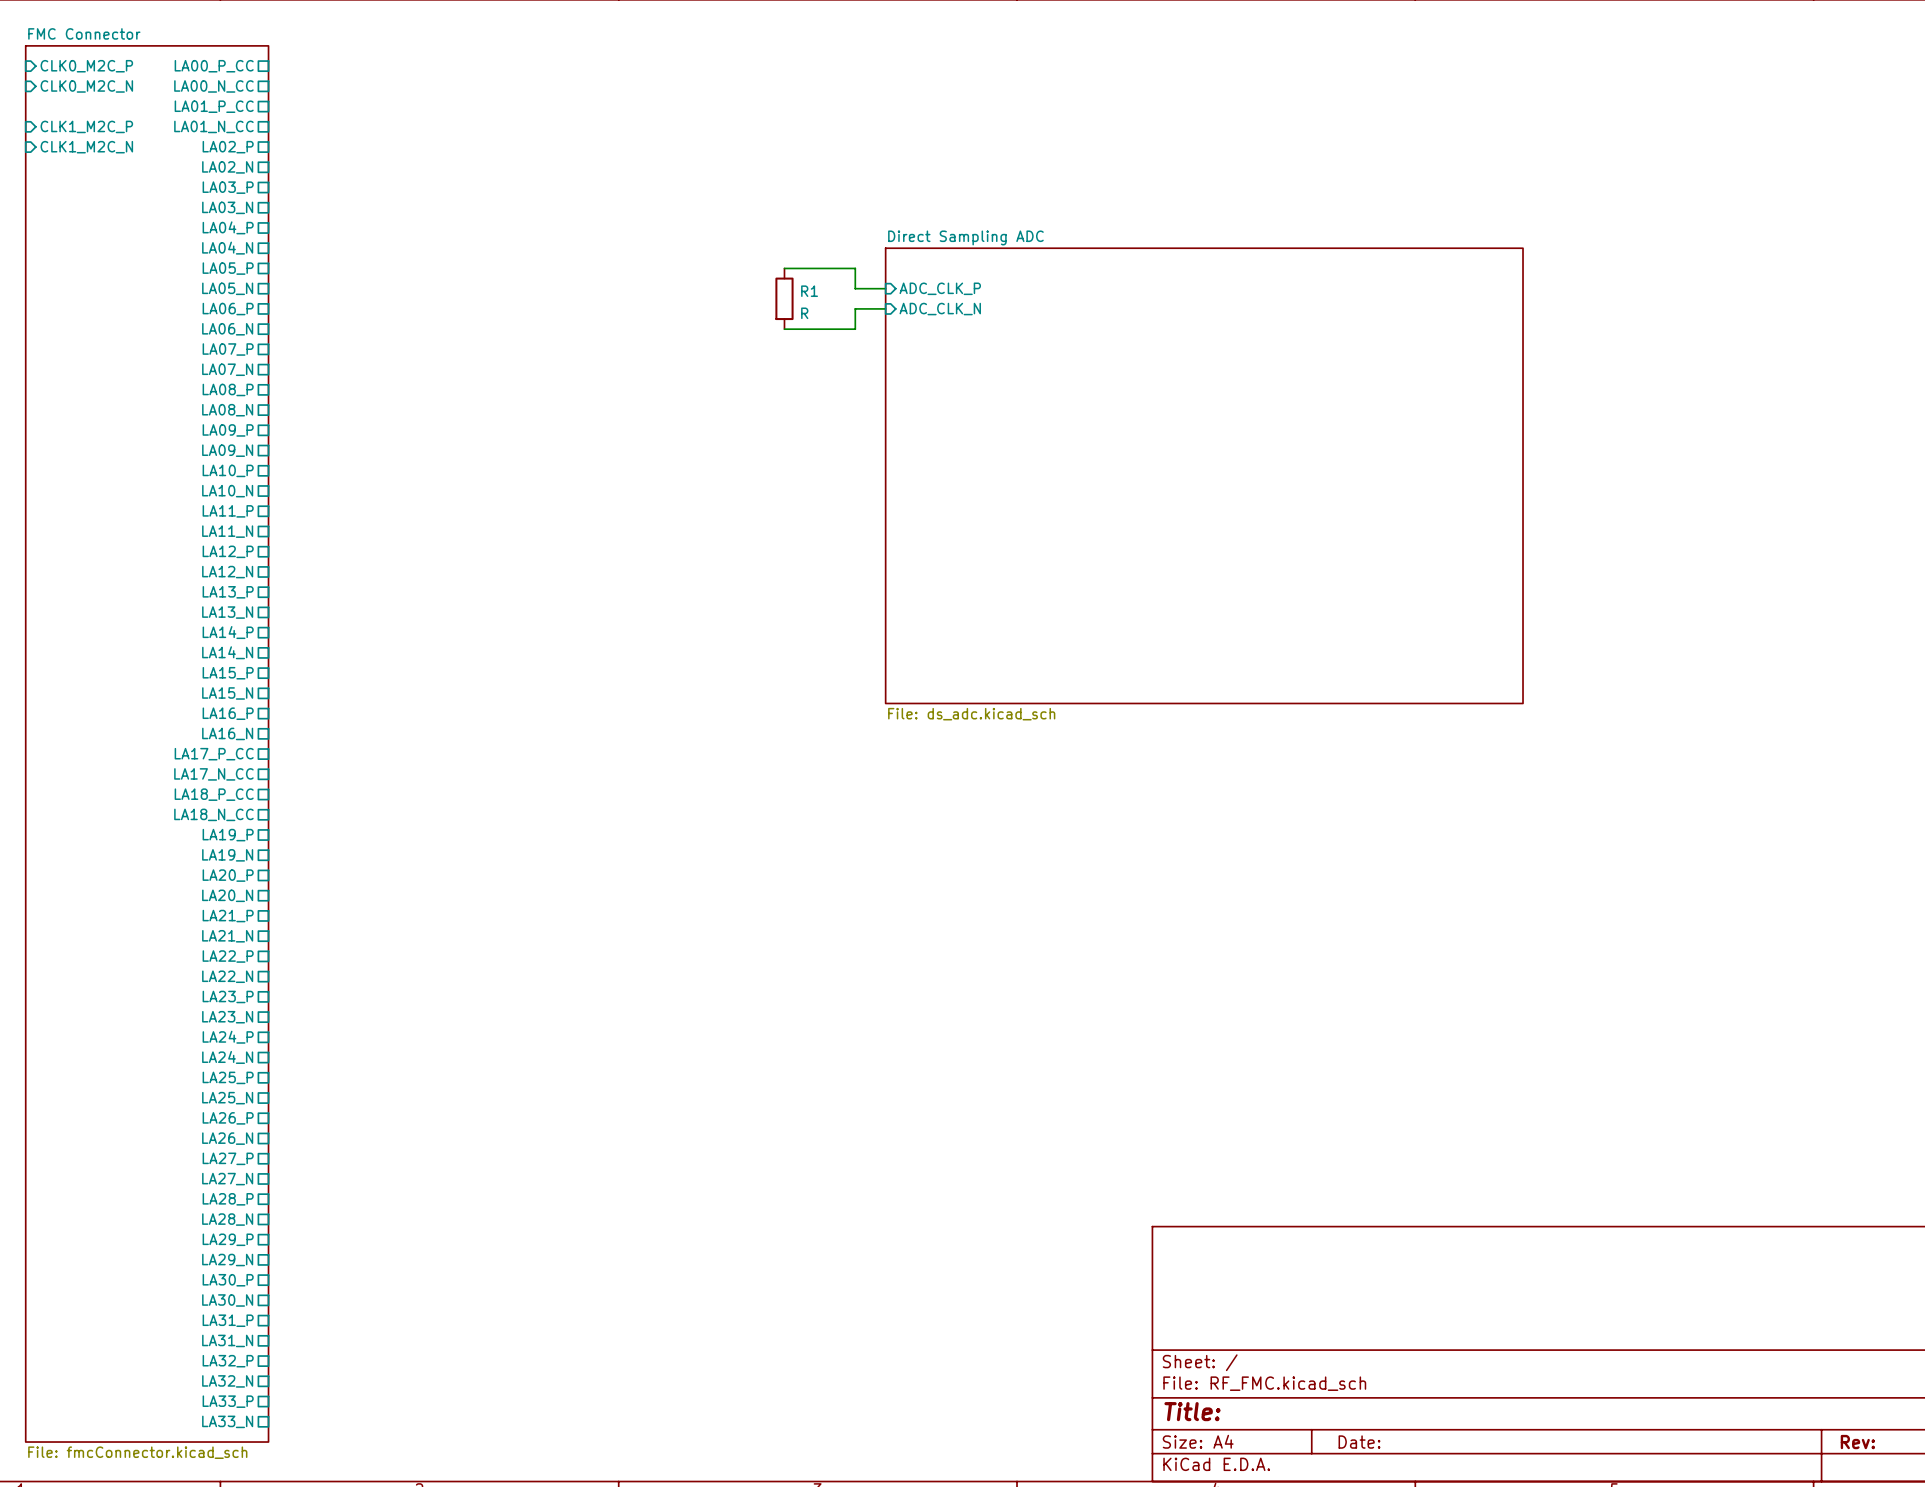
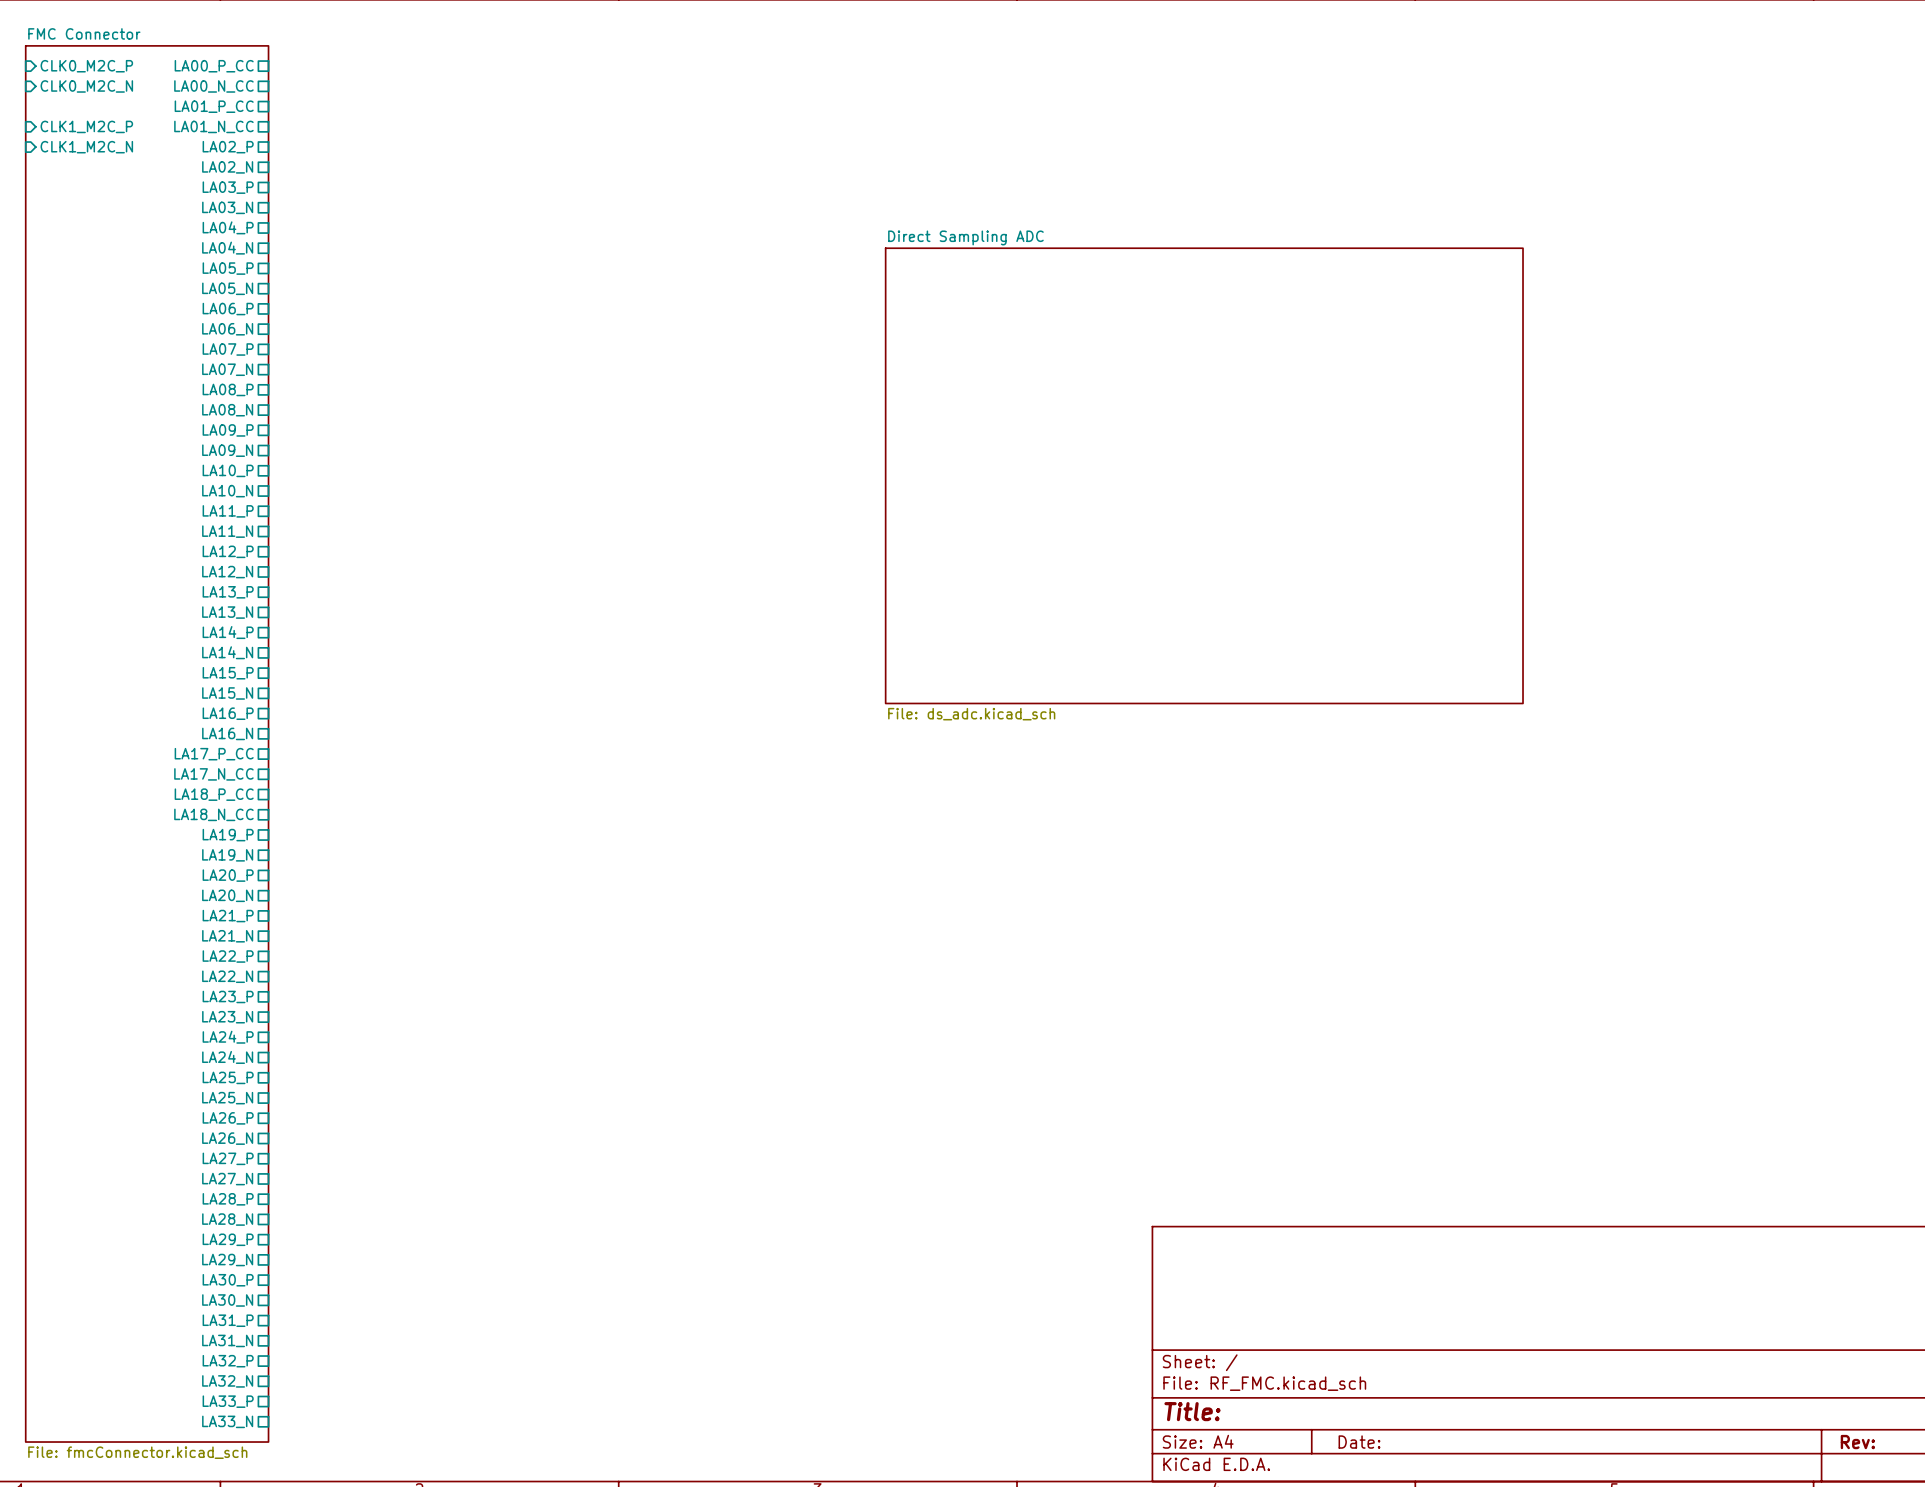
wire: (784, 268) (855, 268) (855, 288) (885, 288) -> none
sheet pin: ADC_CLK_P (940, 288) -> none
R1: R (784, 298) -> none
wire: (885, 308) (855, 308) (855, 329) (784, 329) -> none
sheet pin: ADC_CLK_N (940, 309) -> none

